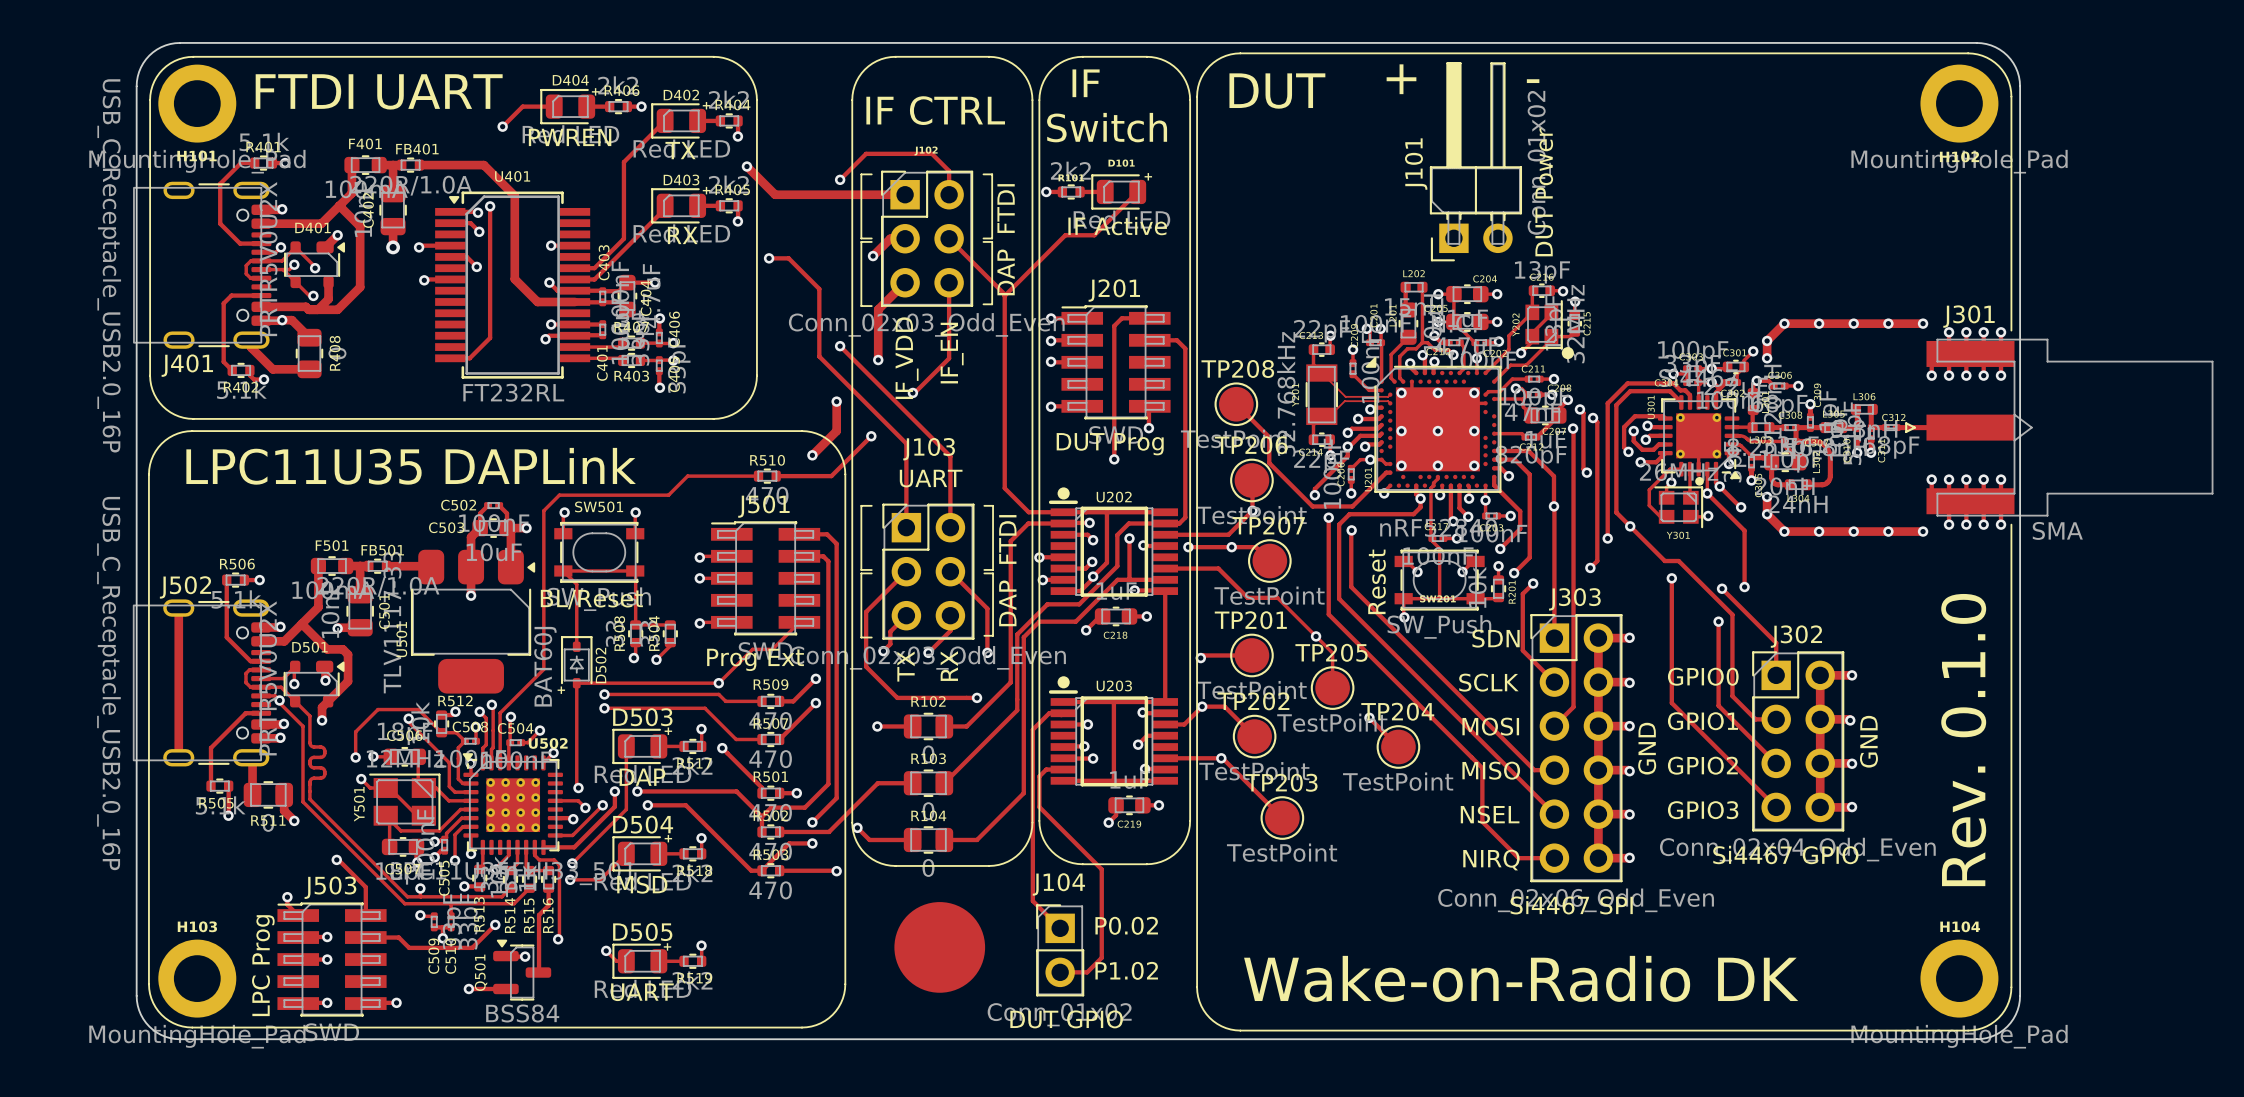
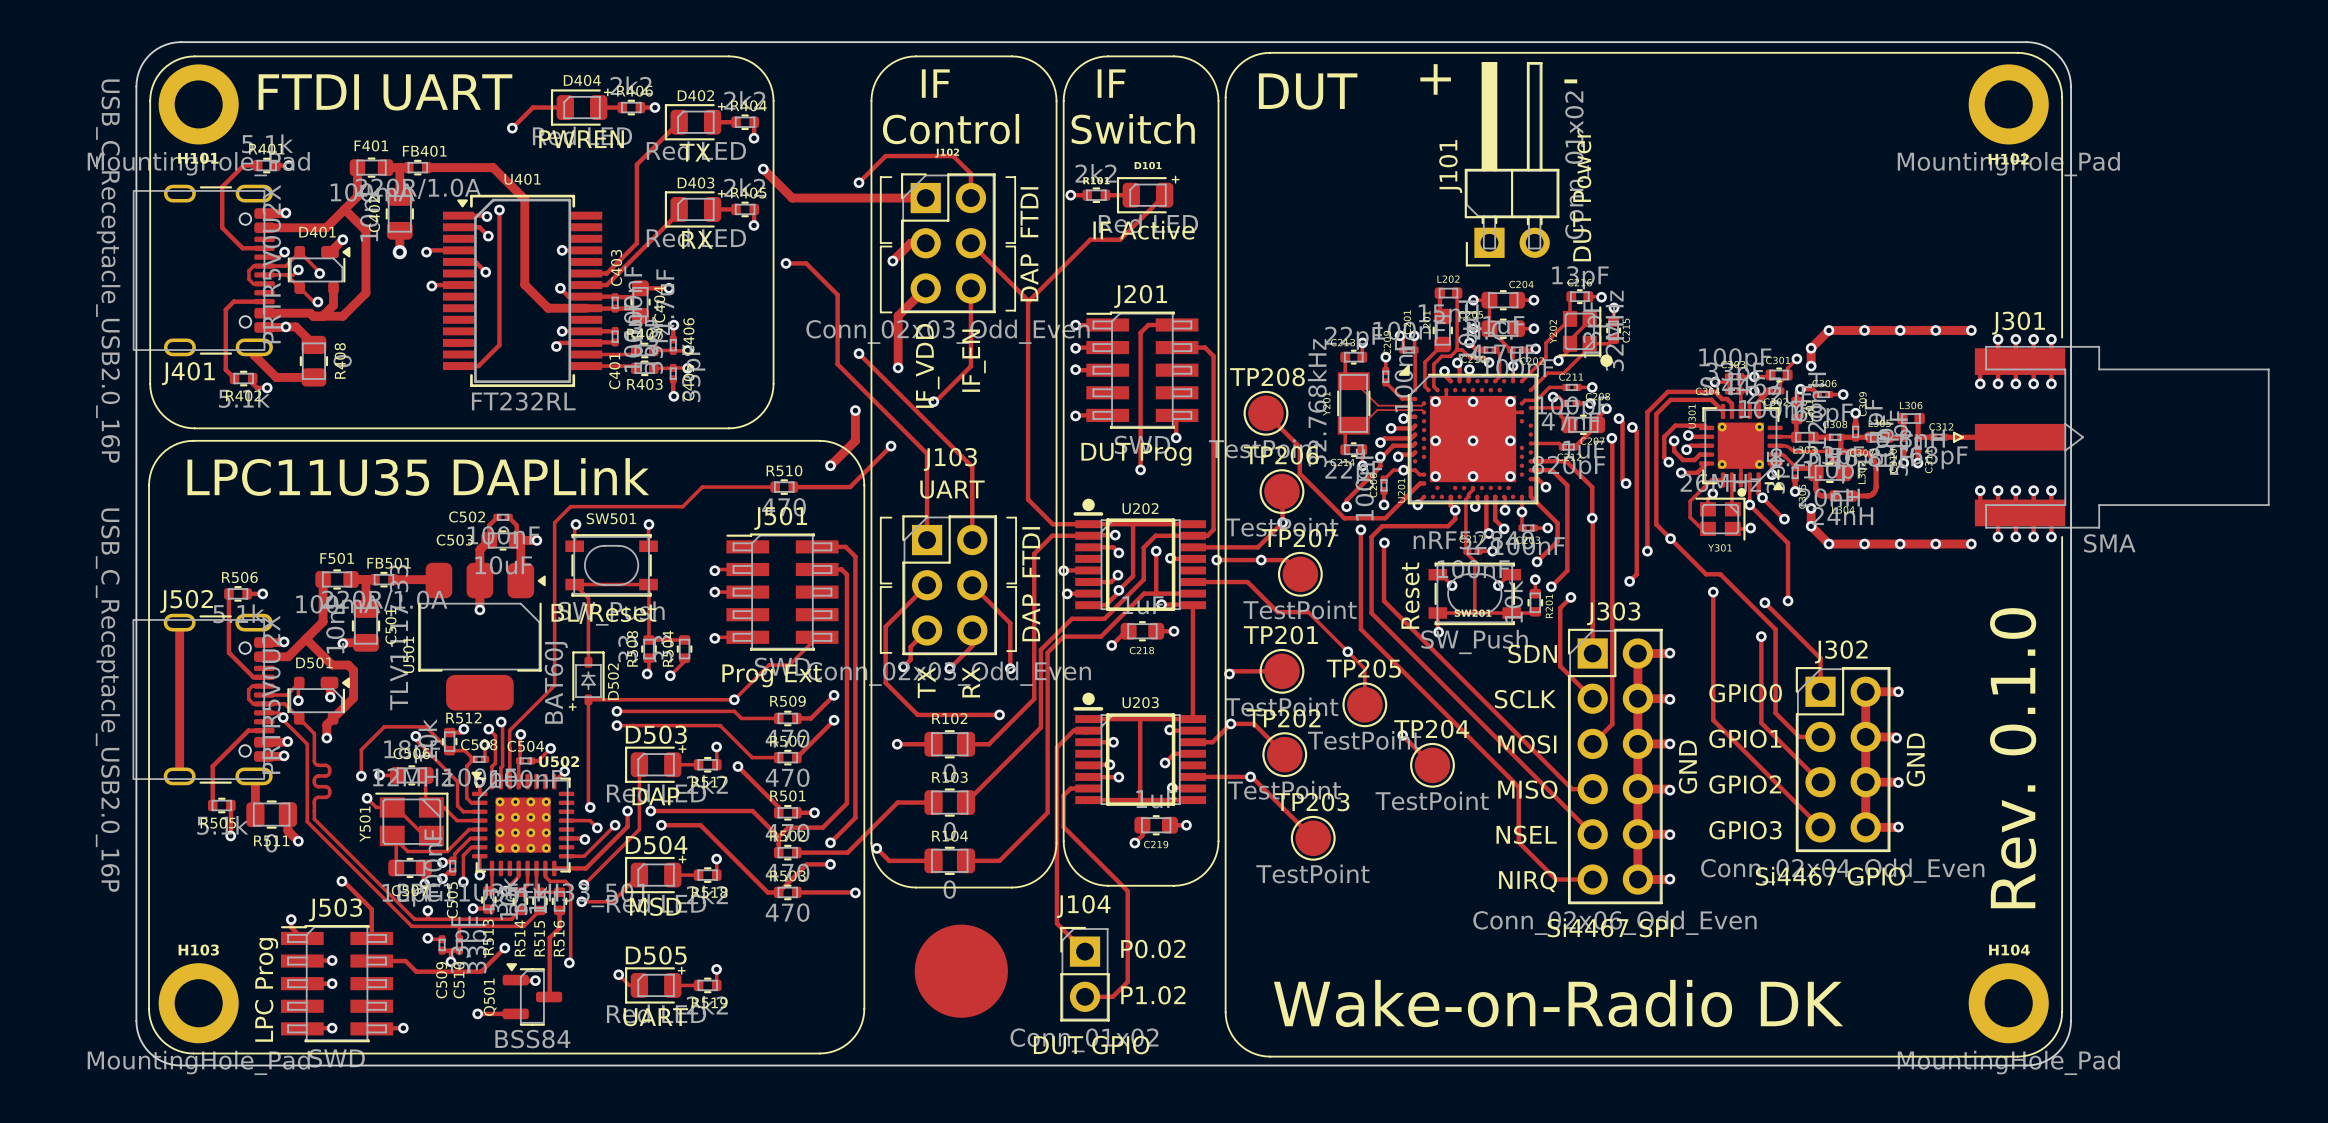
text: none -> IF (935, 83)
text: IF CTRL (935, 110) -> none
text: none -> Control (951, 129)

